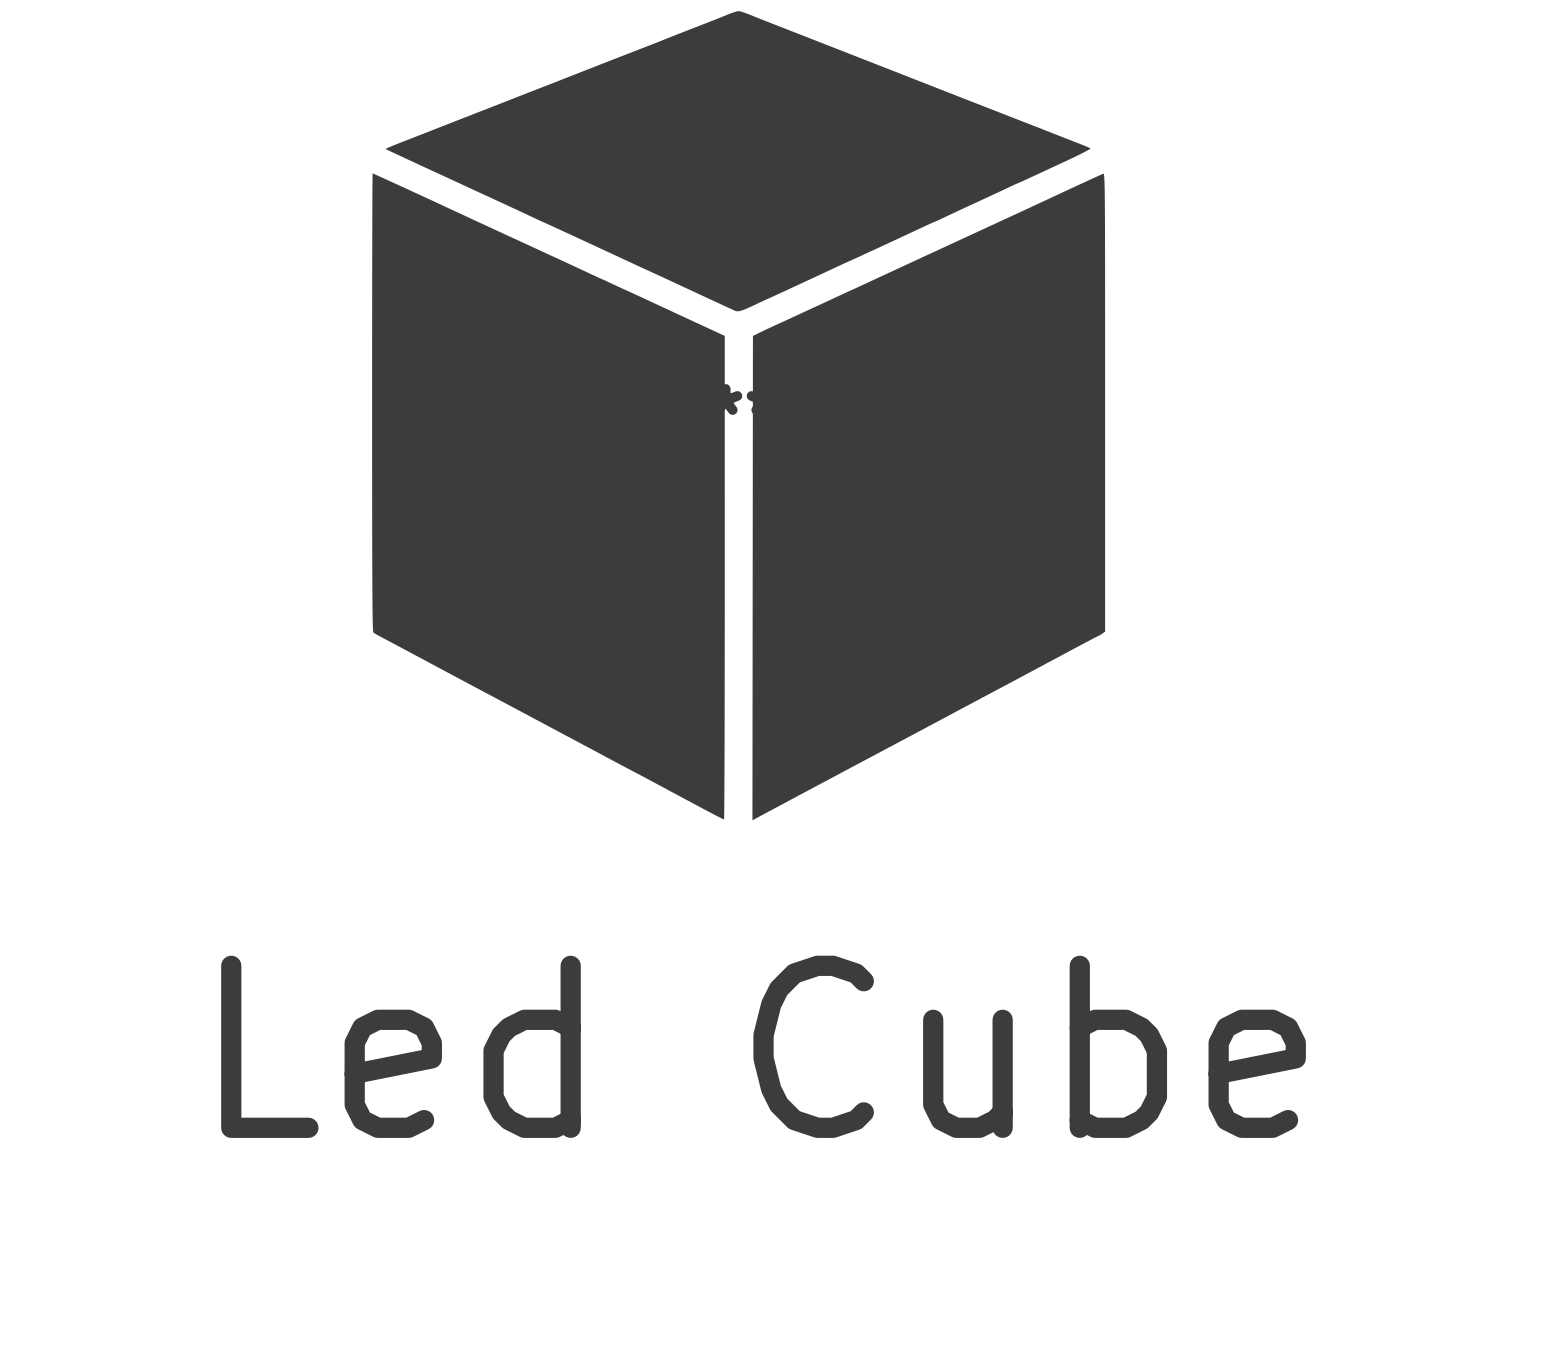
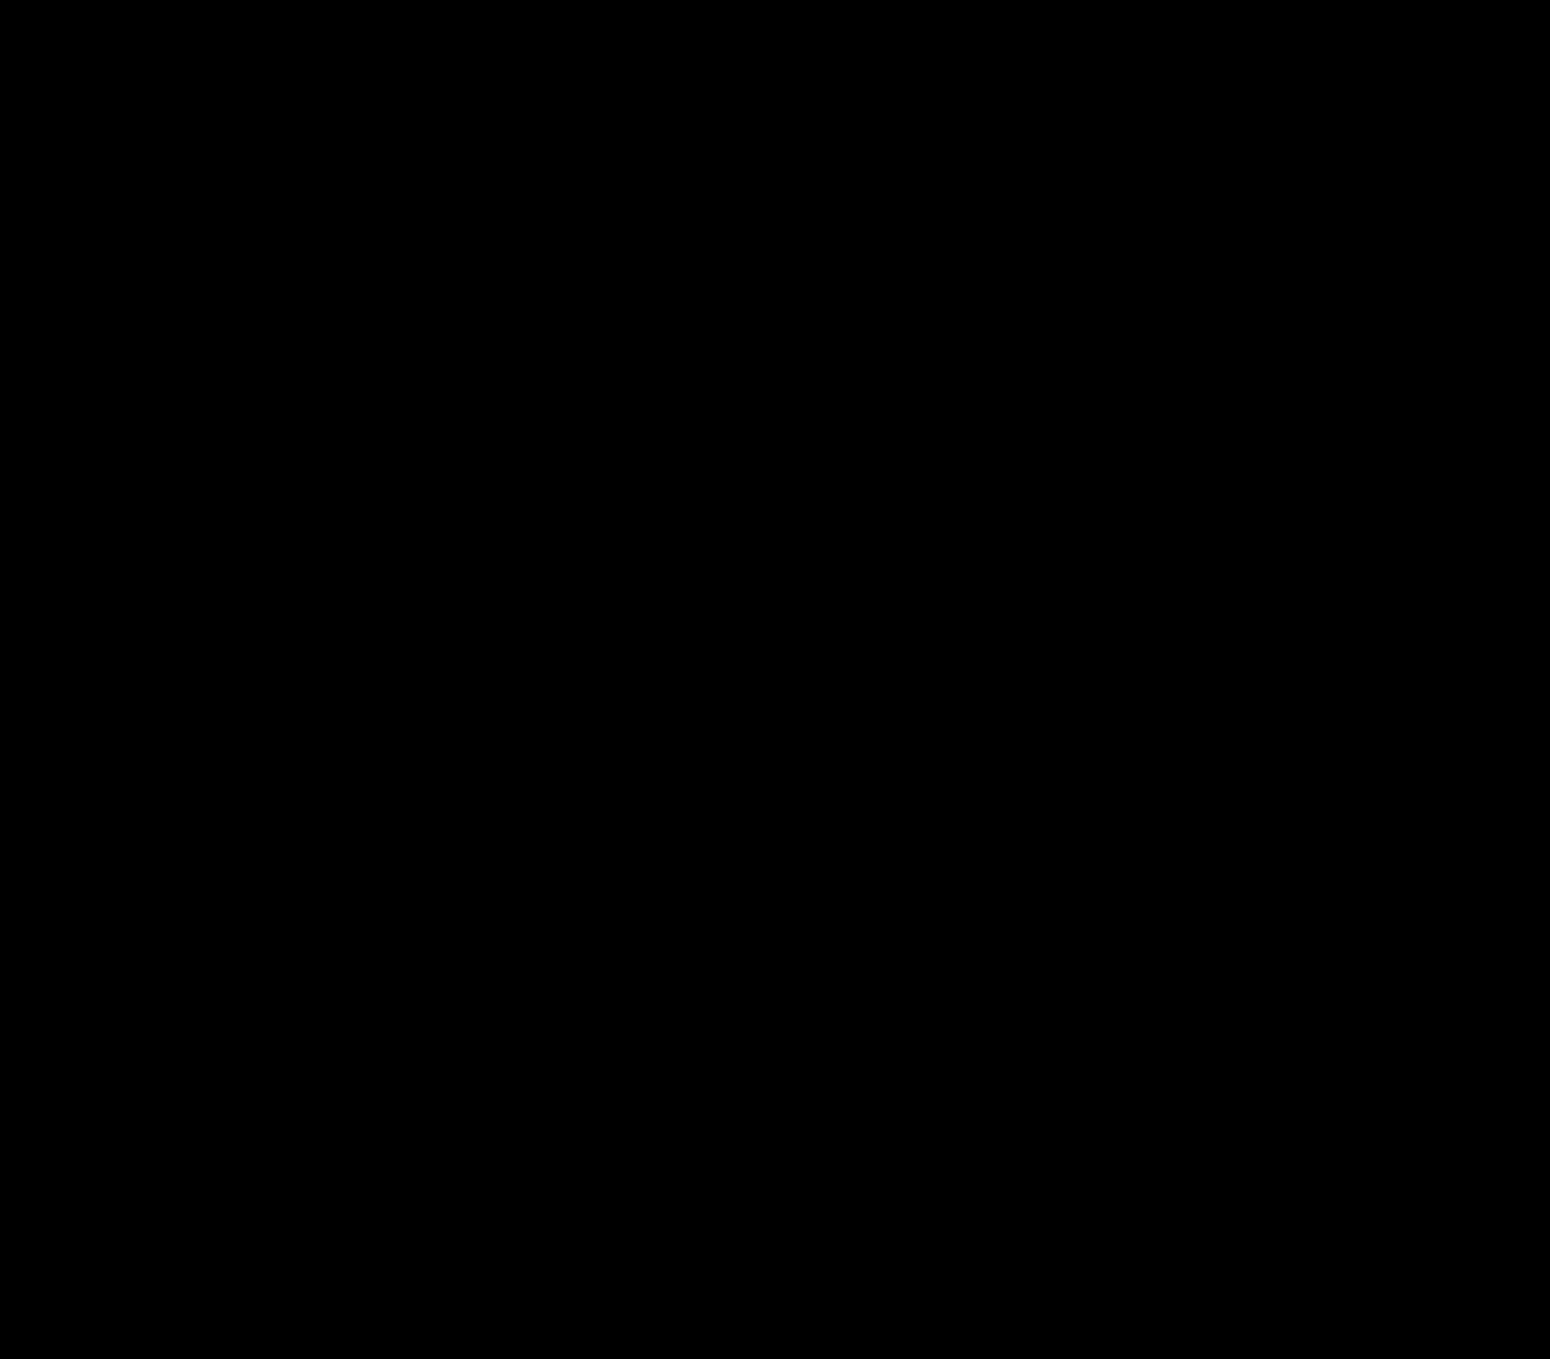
part: (738, 415) -> none
text: Led Cube (763, 1046) -> none

